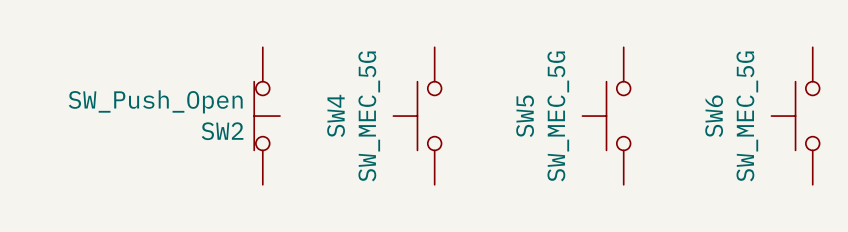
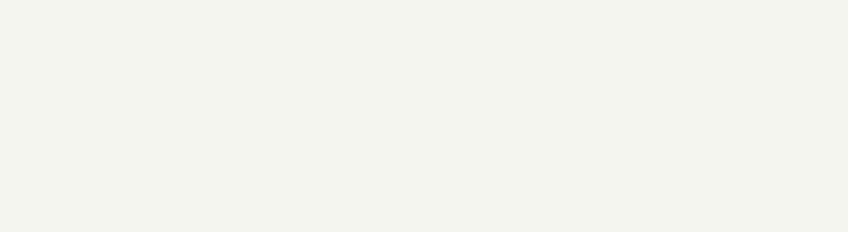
SW2: SW_Push_Open (267, 116) -> none
SW4: SW_MEC_5G (417, 116) -> none
SW5: SW_MEC_5G (606, 116) -> none
SW6: SW_MEC_5G (795, 116) -> none

